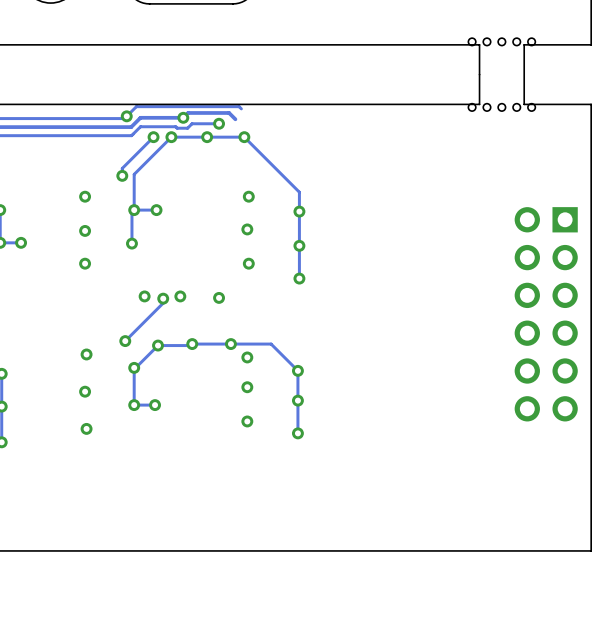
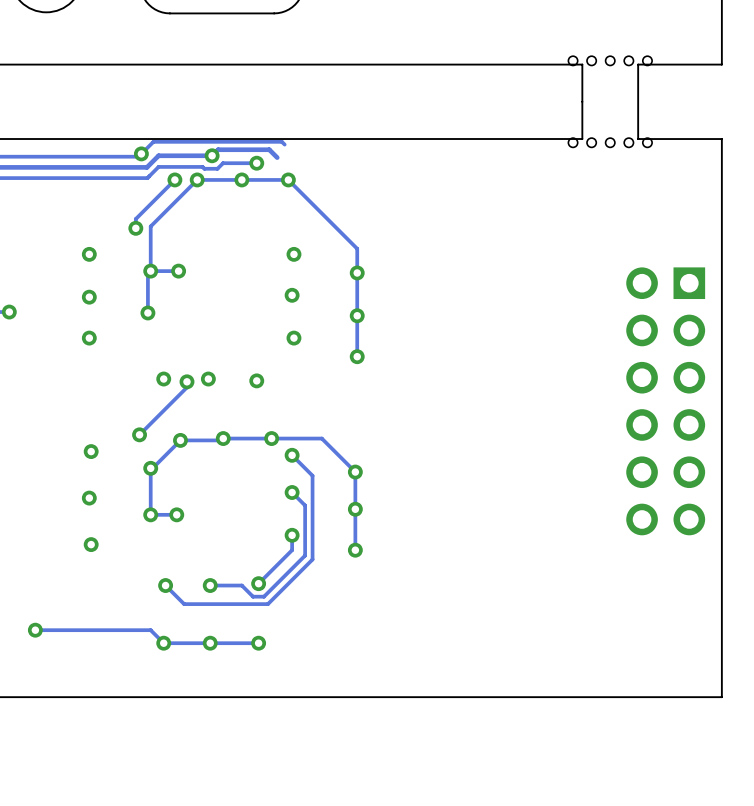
track: none -> (292, 455) (312, 475) (312, 559) (267, 604) (184, 604) (165, 585)
track: none -> (292, 492) (305, 505) (305, 555) (264, 596) (253, 596) (241, 585) (210, 585)
track: none -> (292, 535) (292, 550) (258, 583)
via: none -> (258, 583)
via: none -> (165, 585)
via: none -> (210, 585)
track: none -> (35, 630) (150, 630) (163, 643) (258, 643)
via: none -> (35, 630)
via: none -> (163, 643)
via: none -> (210, 643)
via: none -> (258, 643)

